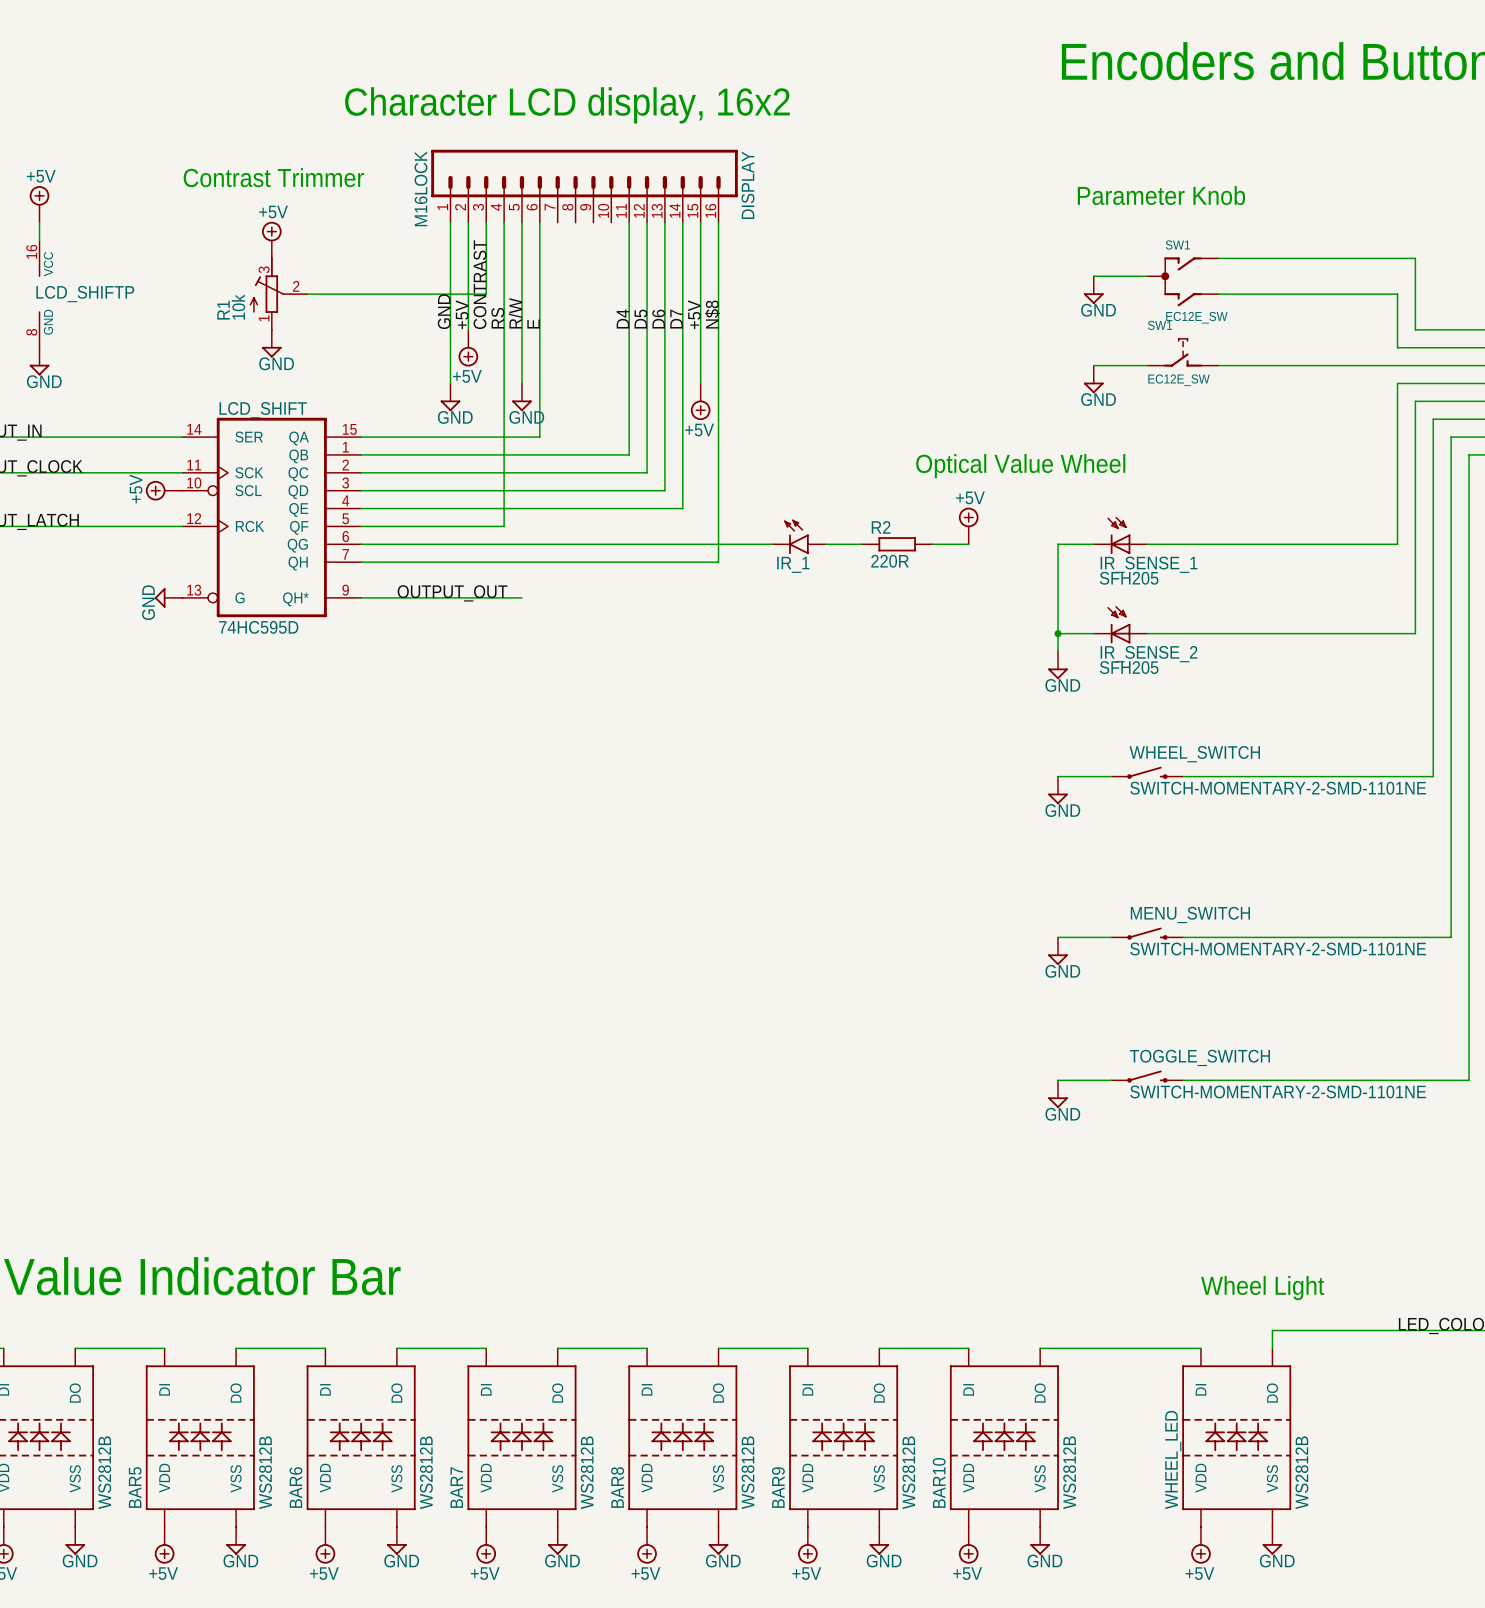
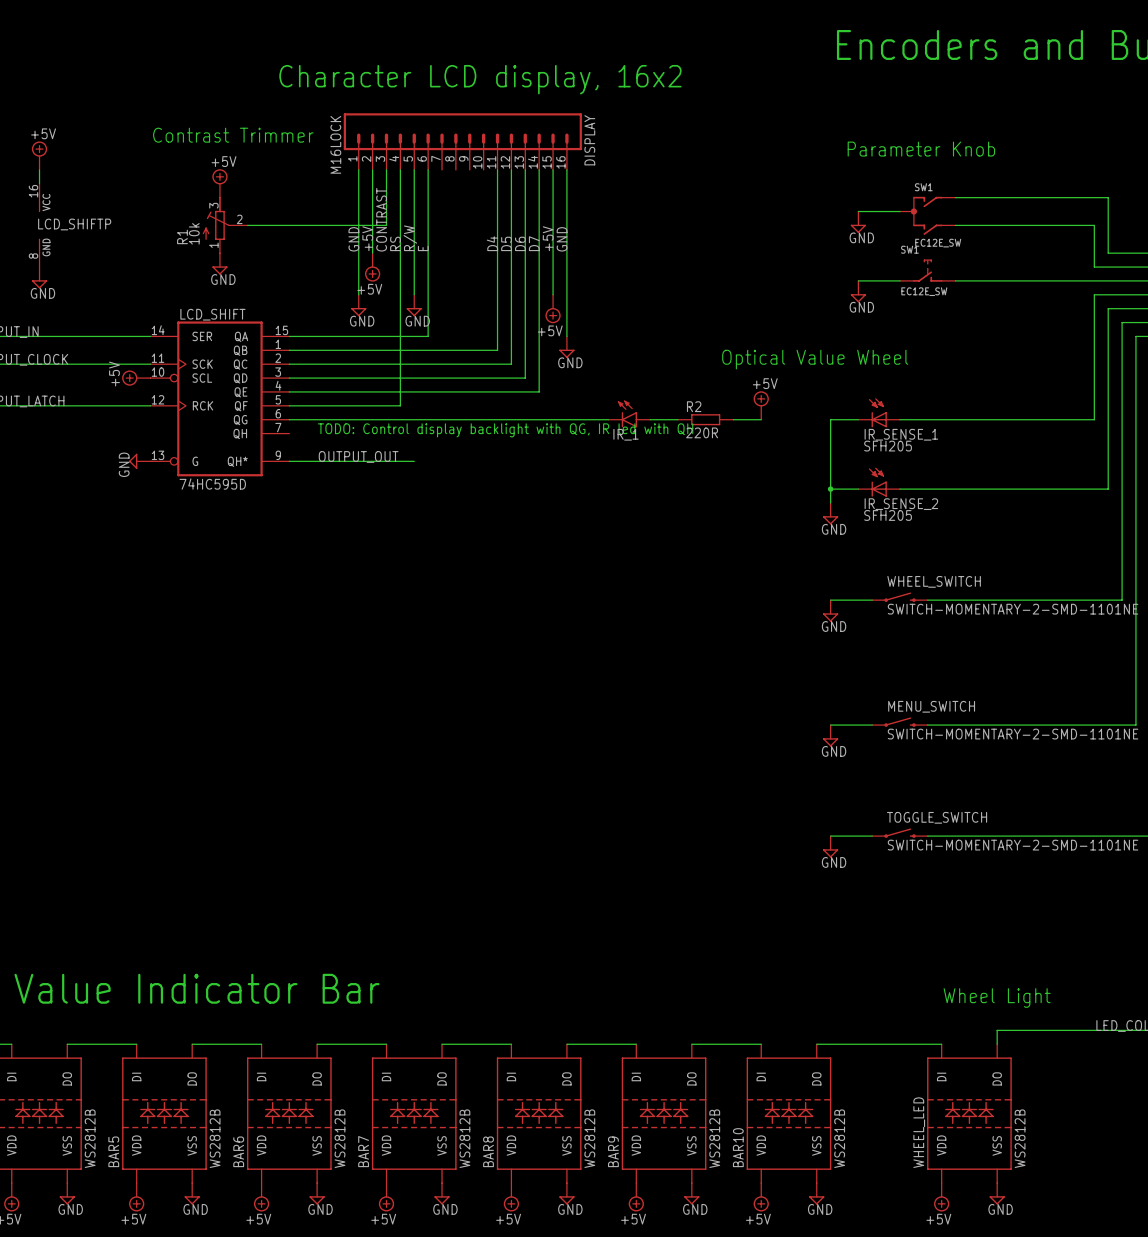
label: N$8 (712, 314) -> GND (562, 239)
wire: (718, 437) (718, 562) (361, 562) -> none
power symbol: none -> GND (566, 347)
text: none -> TODO: Control display backlight with QG, IR led with QH (505, 430)

